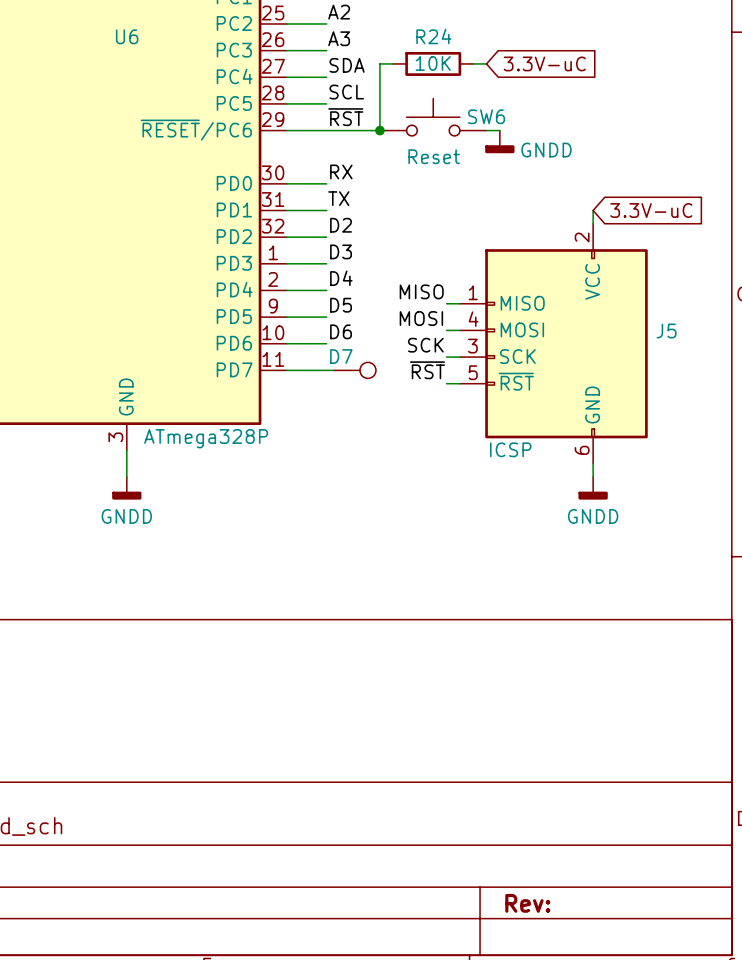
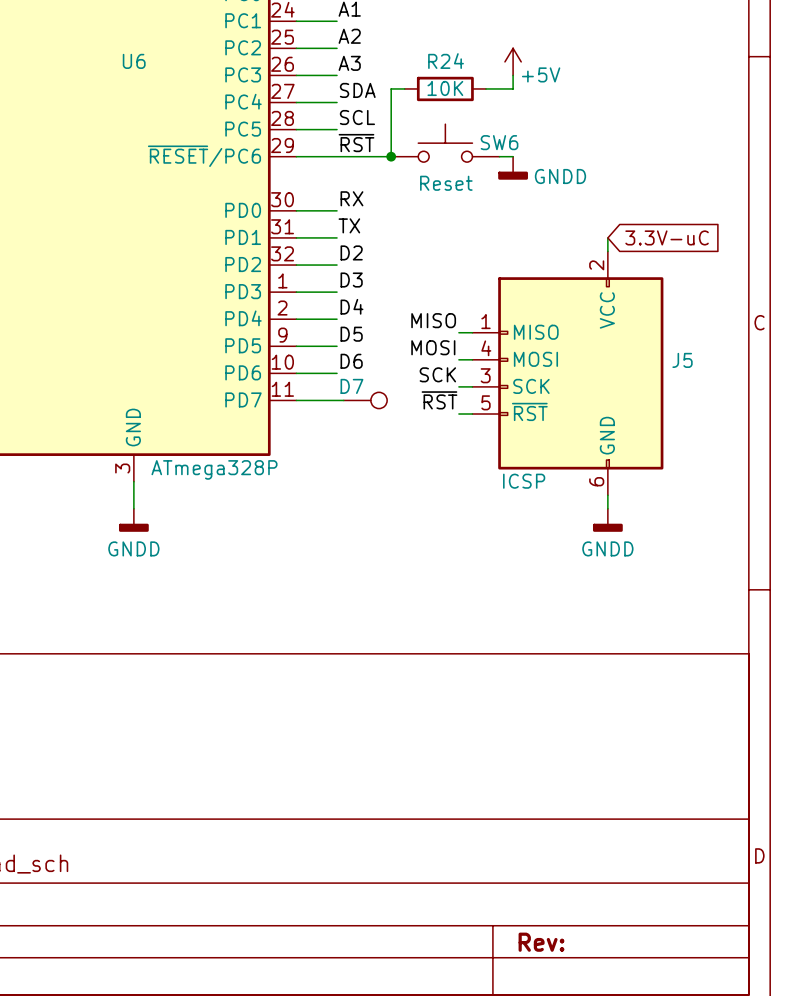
power symbol: none -> +5V (513, 61)
wire: none -> (513, 75) (513, 88) (499, 88)
global label: 3.3V-uC (544, 63) -> none

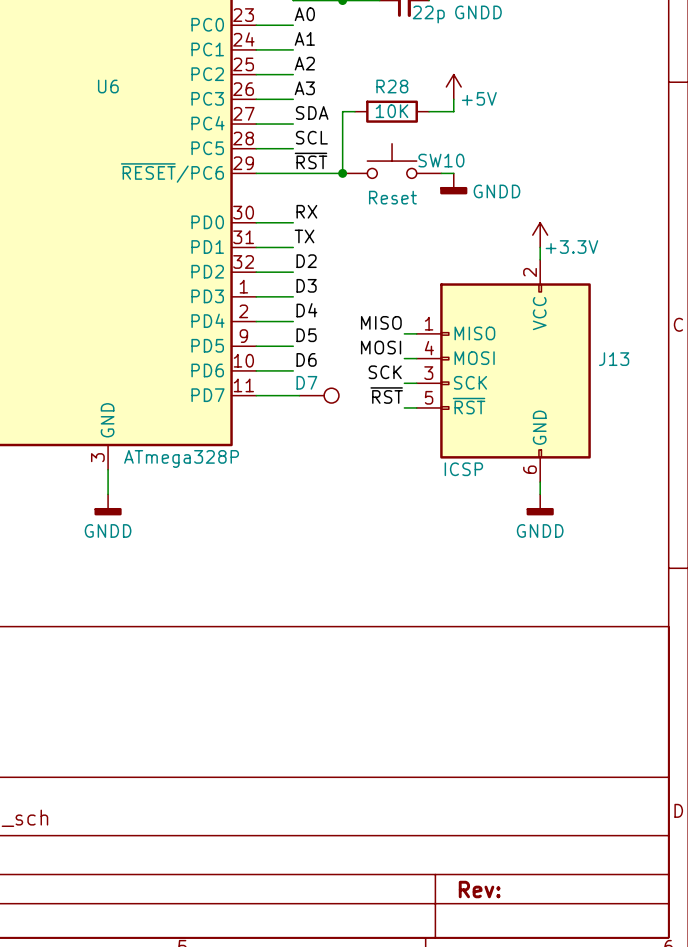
R24 name: R24 (446, 61) -> R28 (392, 86)
SW6 name: SW6 (499, 142) -> SW10 (441, 160)
power symbol: none -> +3.3V (540, 235)
global label: 3.3V-uC (667, 237) -> none
J5 name: J5 (682, 360) -> J13 (614, 359)

